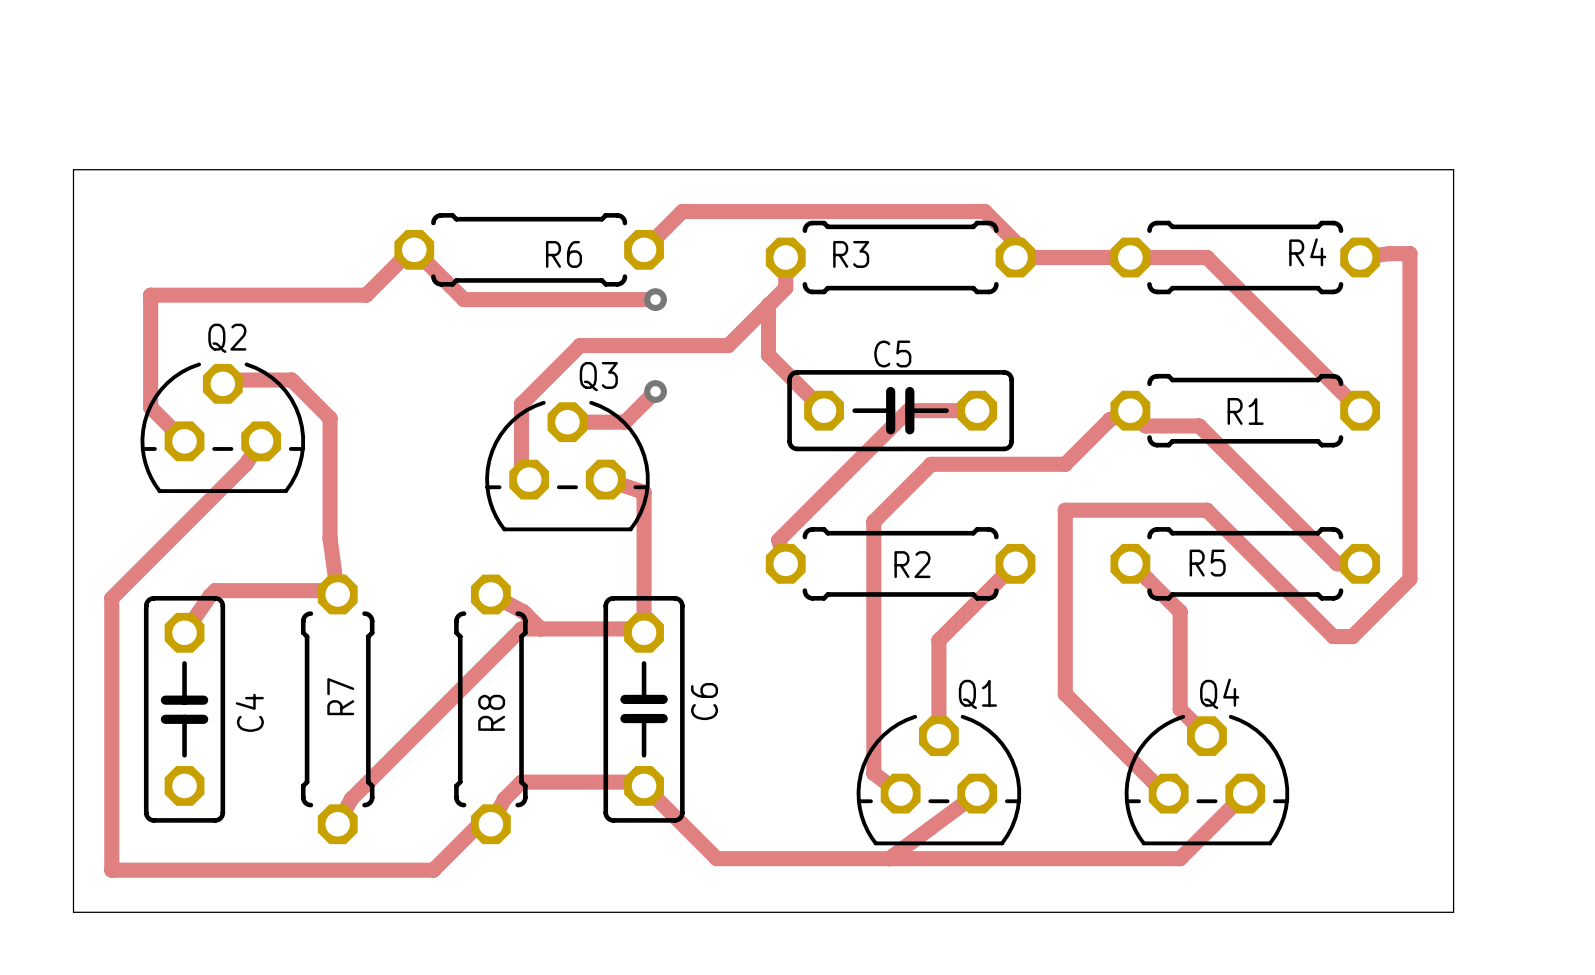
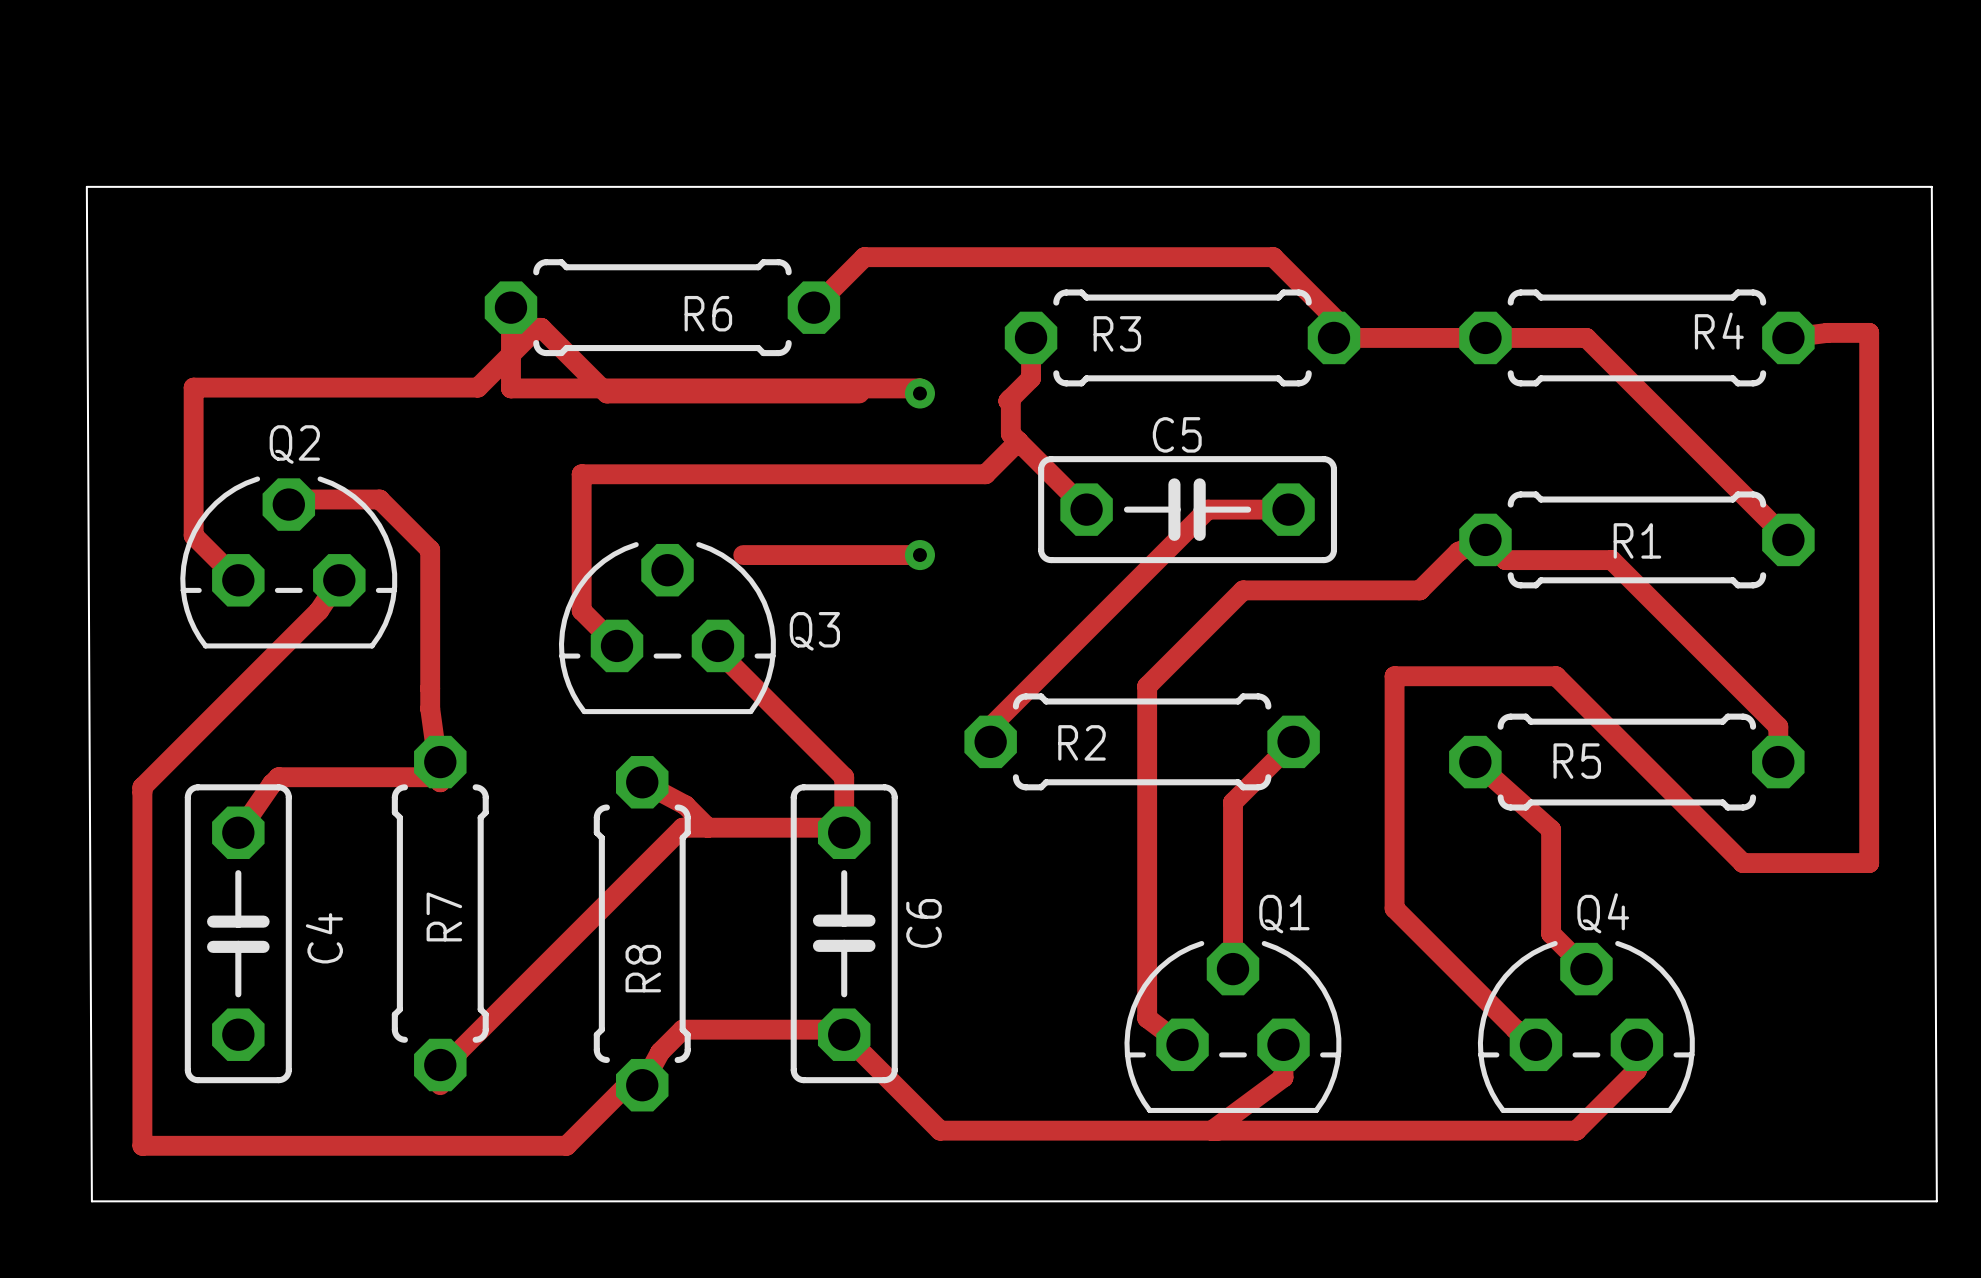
track: (984, 211) (682, 211) (644, 249) -> (1293, 277) (1273, 257) (864, 257) (813, 307)
track: none -> (510, 307) (510, 388) (919, 388) (919, 393)
R6 position: (529, 249) -> (662, 307)
track: (1409, 253) (1409, 579) (1352, 636) (1333, 636) (1206, 510) (1065, 510) (1065, 694) -> (1854, 332) (1869, 332) (1869, 863) (1742, 863) (1556, 676) (1394, 676) (1394, 908) (1399, 913)
via position: (655, 299) -> (919, 393)
track: none -> (1010, 398) (1010, 433) (1086, 509)
track: none -> (1018, 441) (985, 474) (581, 474) (581, 610) (617, 645)
Q3 name position: Q3 (598, 376) -> Q3 (814, 631)
track: none -> (1288, 509) (1207, 509) (987, 730) (990, 741)
track: (655, 391) (624, 422) -> (919, 555) (818, 555)
via: (655, 391) -> none
Q3 footprint: [485, 400, 650, 532] -> [558, 542, 776, 715]
track: (824, 410) (768, 355) (768, 305) (728, 345) (580, 345) (521, 404) (521, 471) (529, 479) -> none
C5 position: (900, 410) -> (1187, 509)
track: (977, 410) (908, 410) (778, 540) (785, 563) -> none
via: none -> (919, 555)
track: (1199, 425) (1337, 563) (1360, 563) -> (1576, 560) (1611, 560) (1778, 726) (1778, 762)
track: (1080, 448) (1065, 464) (931, 464) -> (1419, 590) (1243, 590) (1222, 610)
track: (605, 479) (644, 492) (644, 590) -> (717, 645) (717, 650) (844, 777)
R2 position: (900, 563) -> (1142, 741)
track: (1015, 563) (938, 640) -> (1293, 741) (1233, 802) (1233, 842)
track: (1130, 563) (1180, 611) (1180, 630) -> (1475, 762) (1551, 829)
R5 position: (1245, 563) -> (1626, 762)
R2 name position: R2 (912, 564) -> R2 (1082, 742)
R7 position: (337, 709) -> (440, 913)
R8 name position: R8 (491, 712) -> R8 (643, 968)
track: (977, 793) (889, 858) -> (1283, 1044) (1283, 1077) (1211, 1130)
track: (1245, 793) (1180, 858) -> (1636, 1044) (1636, 1070) (1576, 1130) (1551, 1130)
board edge: (73, 912) (73, 169) (1453, 169) (1453, 912) -> (91, 1201) (86, 186) (1931, 186) (1936, 1201) (1911, 1201)

